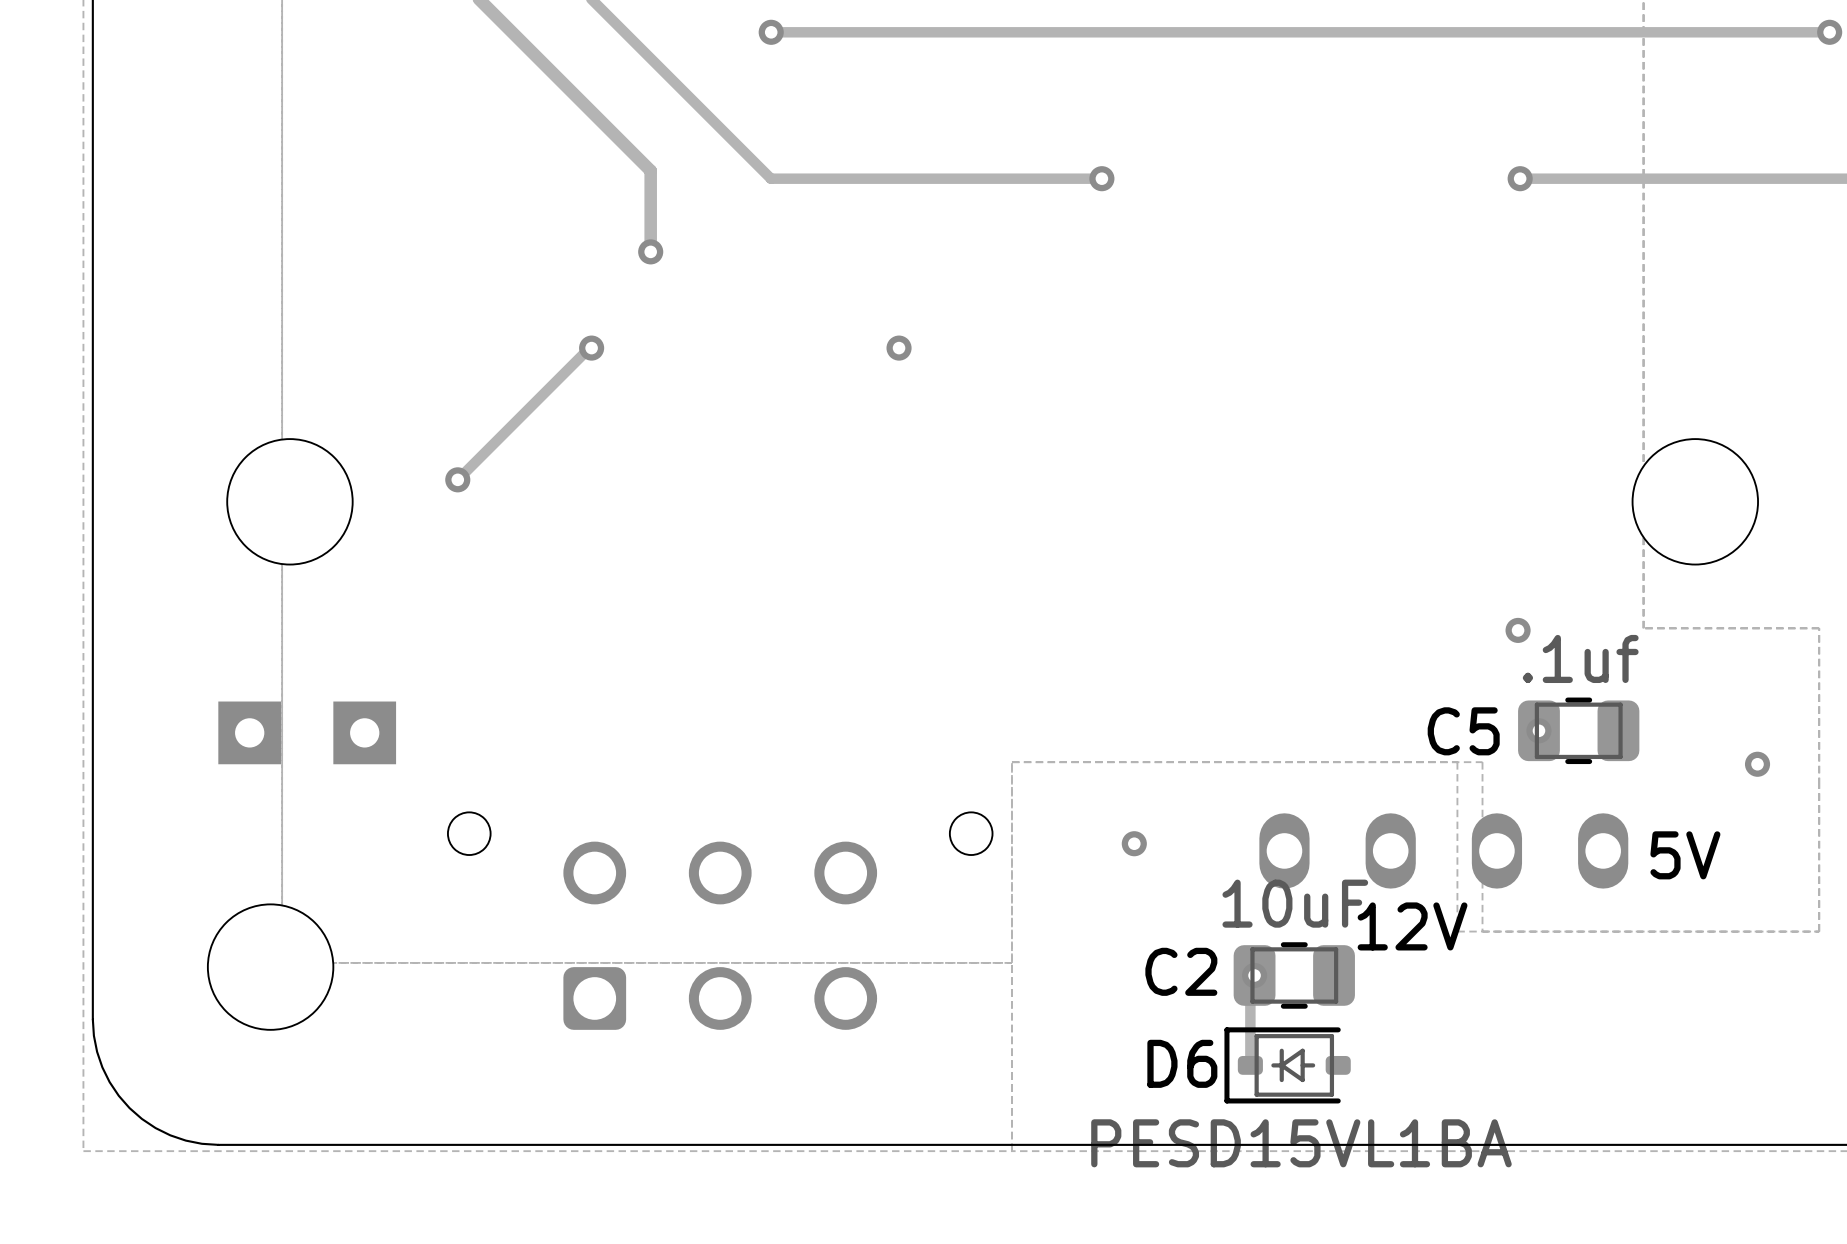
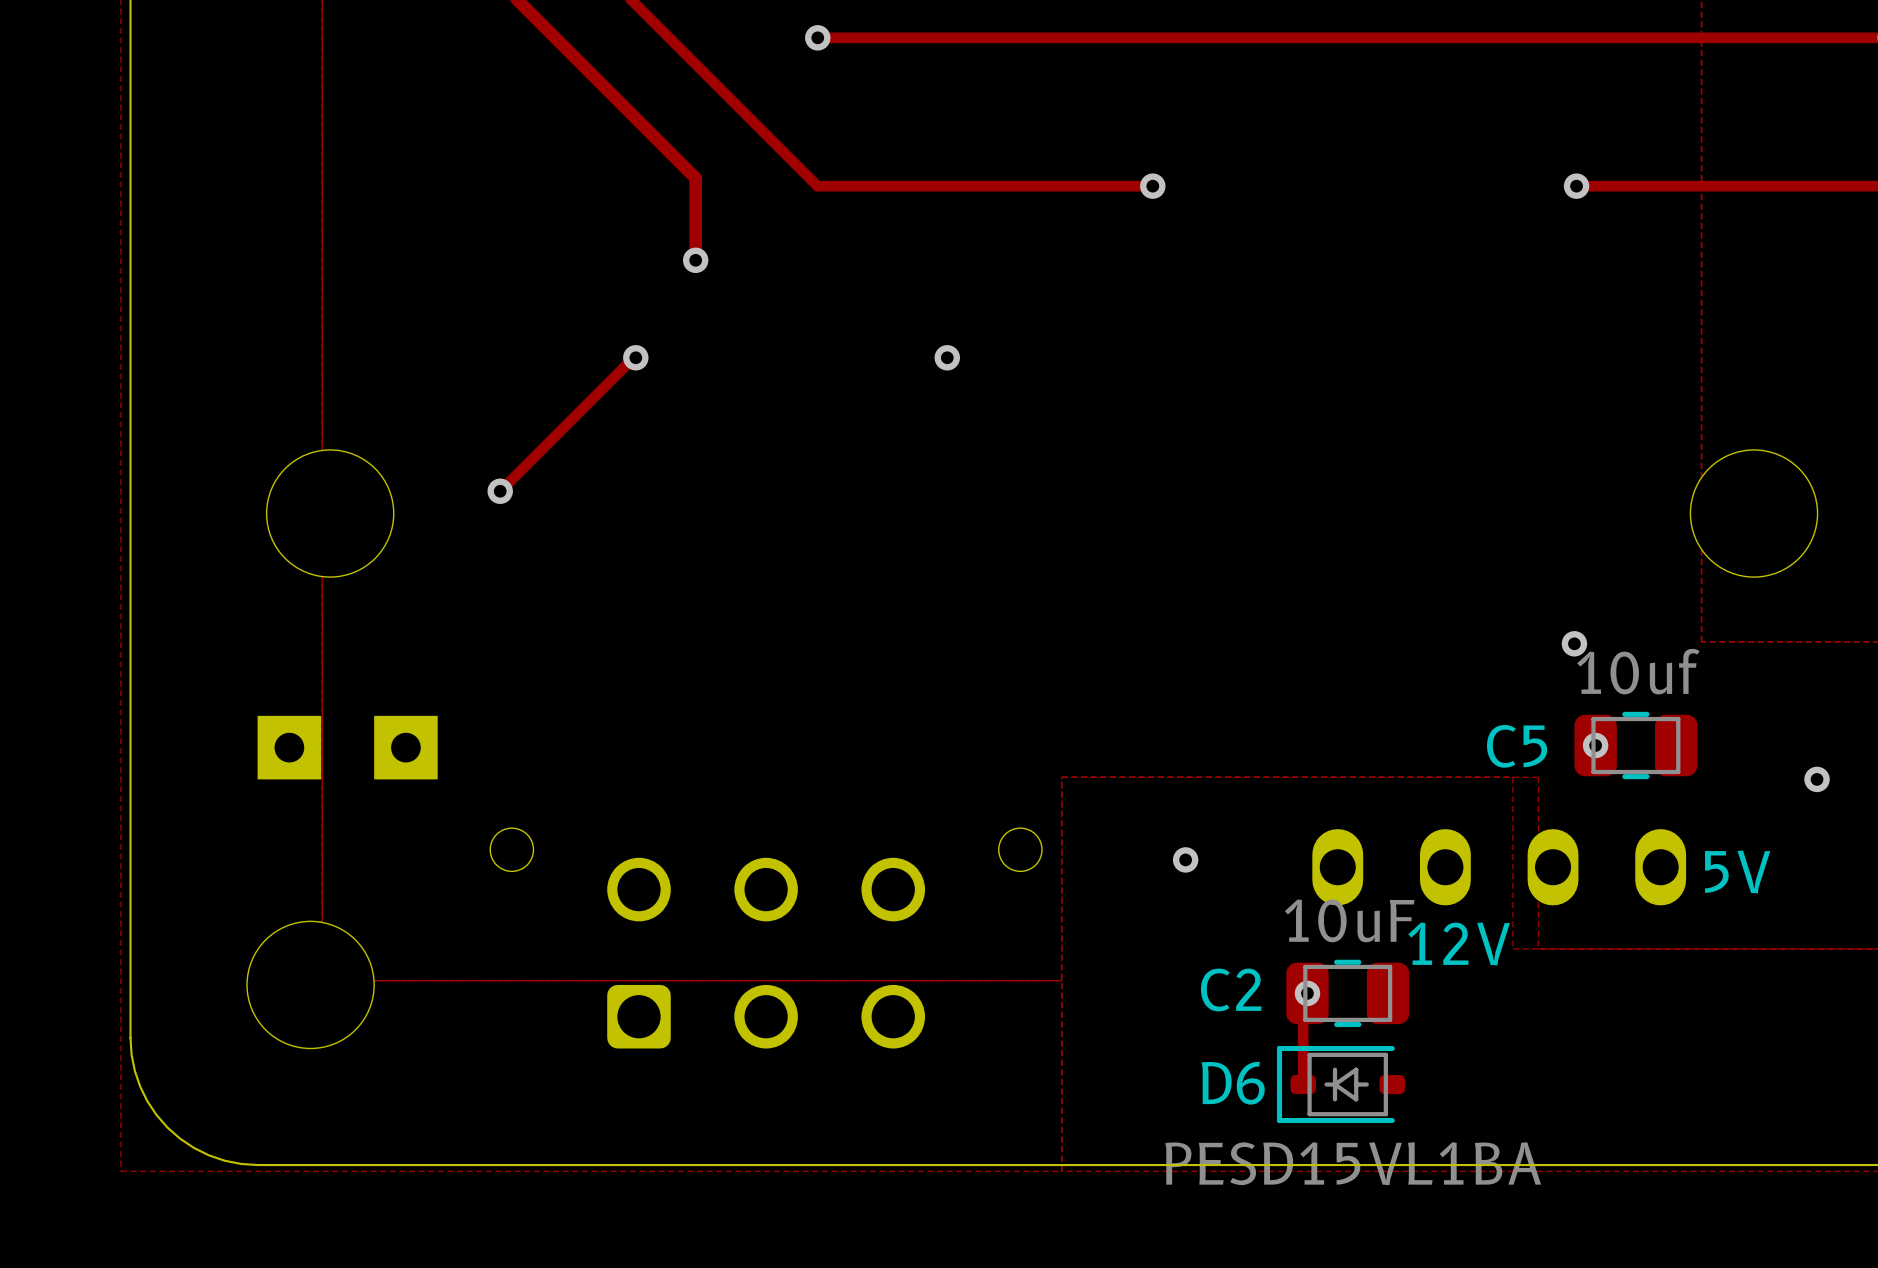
C5 value: .1uf (1580, 658) -> 10uf (1638, 671)

